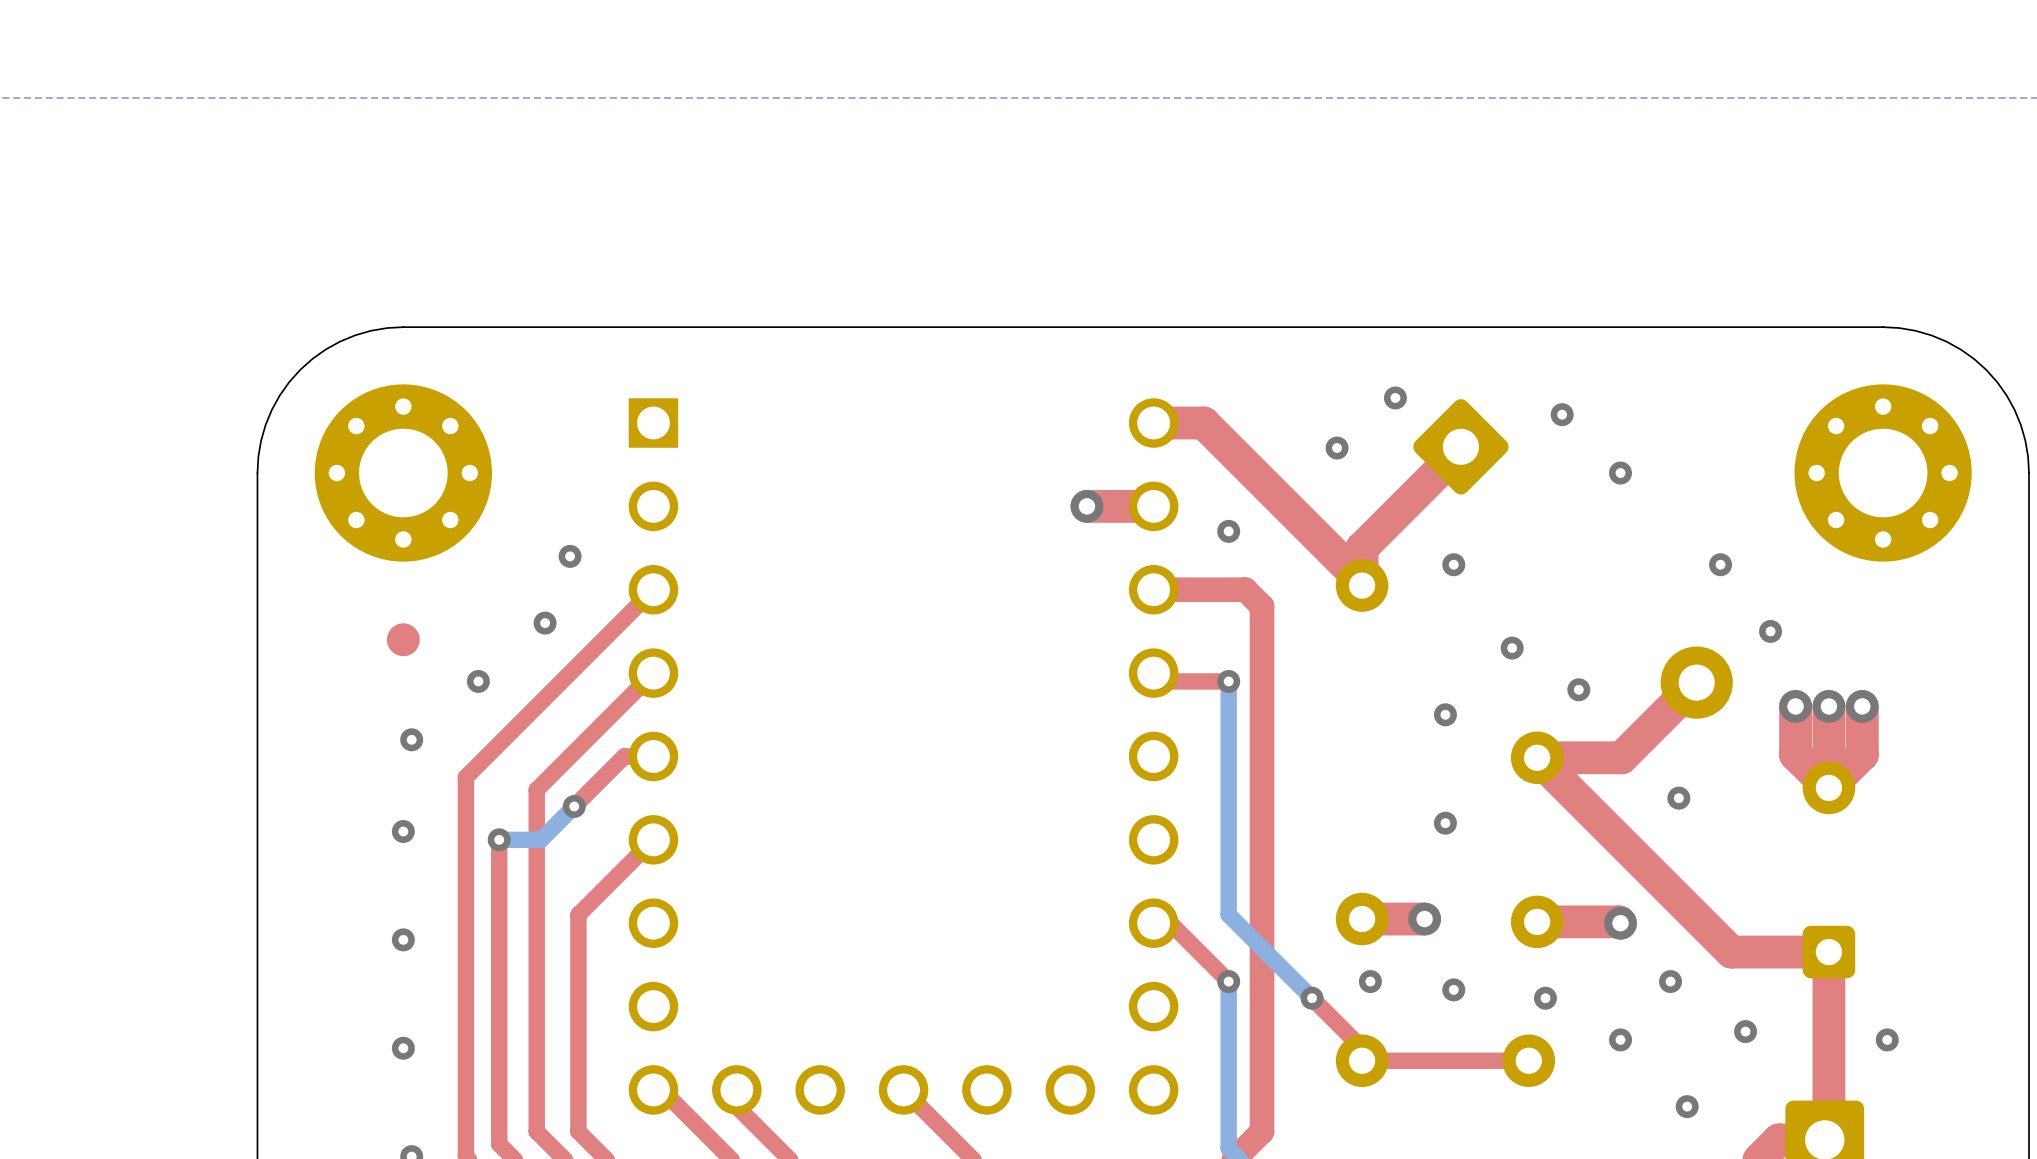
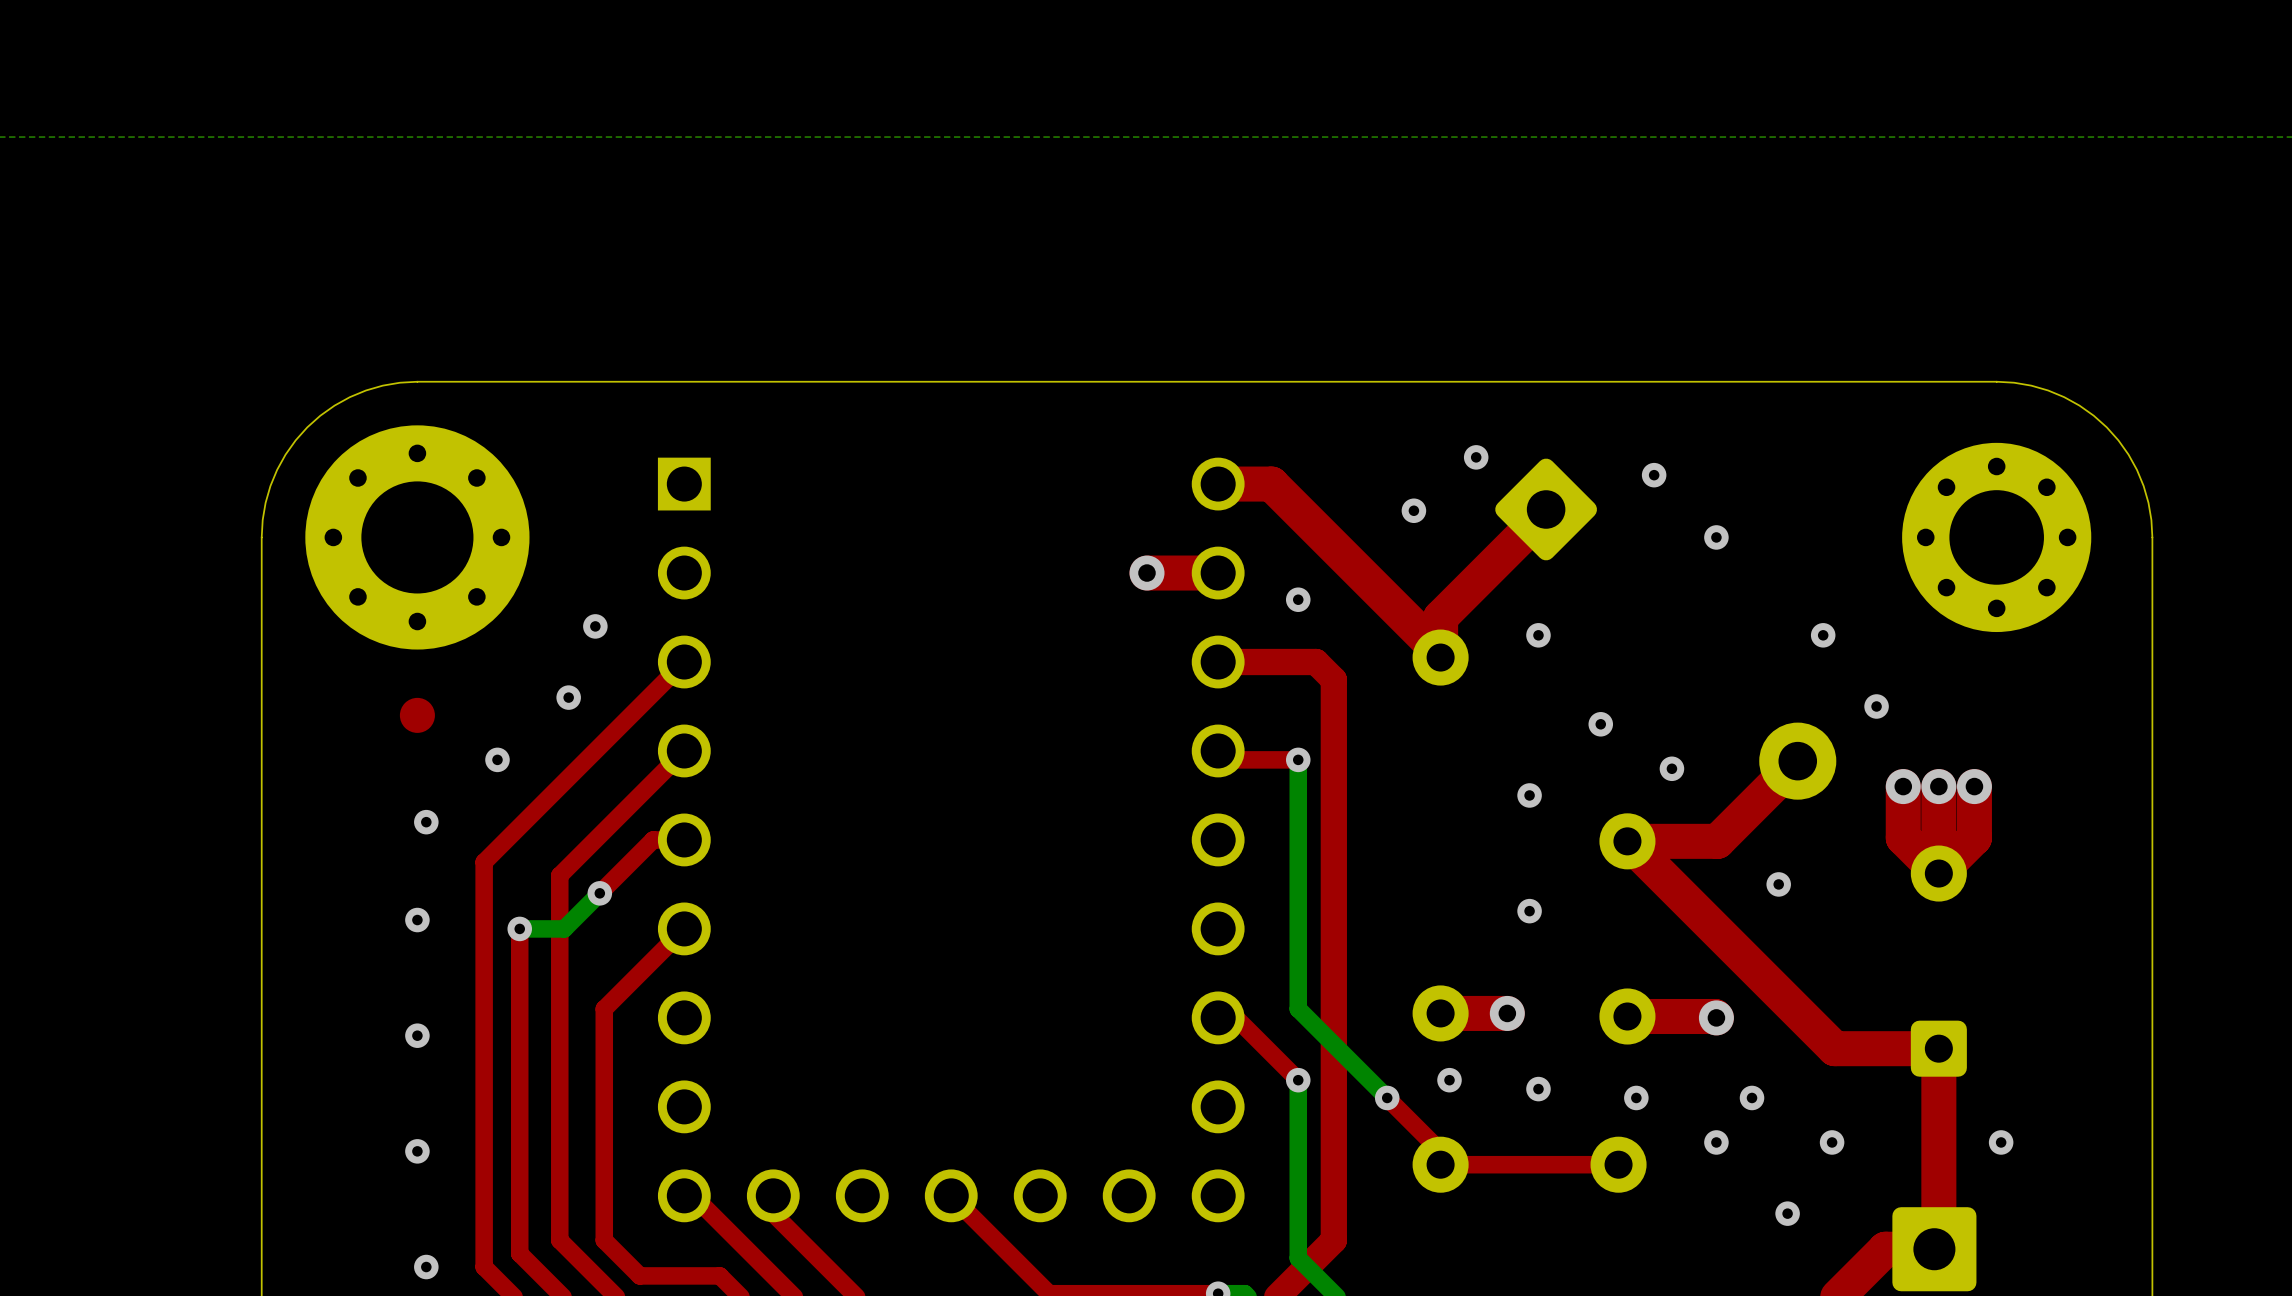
part footprint: [314, 384, 492, 562] -> [305, 425, 530, 650]
via position: (1670, 981) -> (1752, 1097)
via position: (1745, 1031) -> (1832, 1142)

